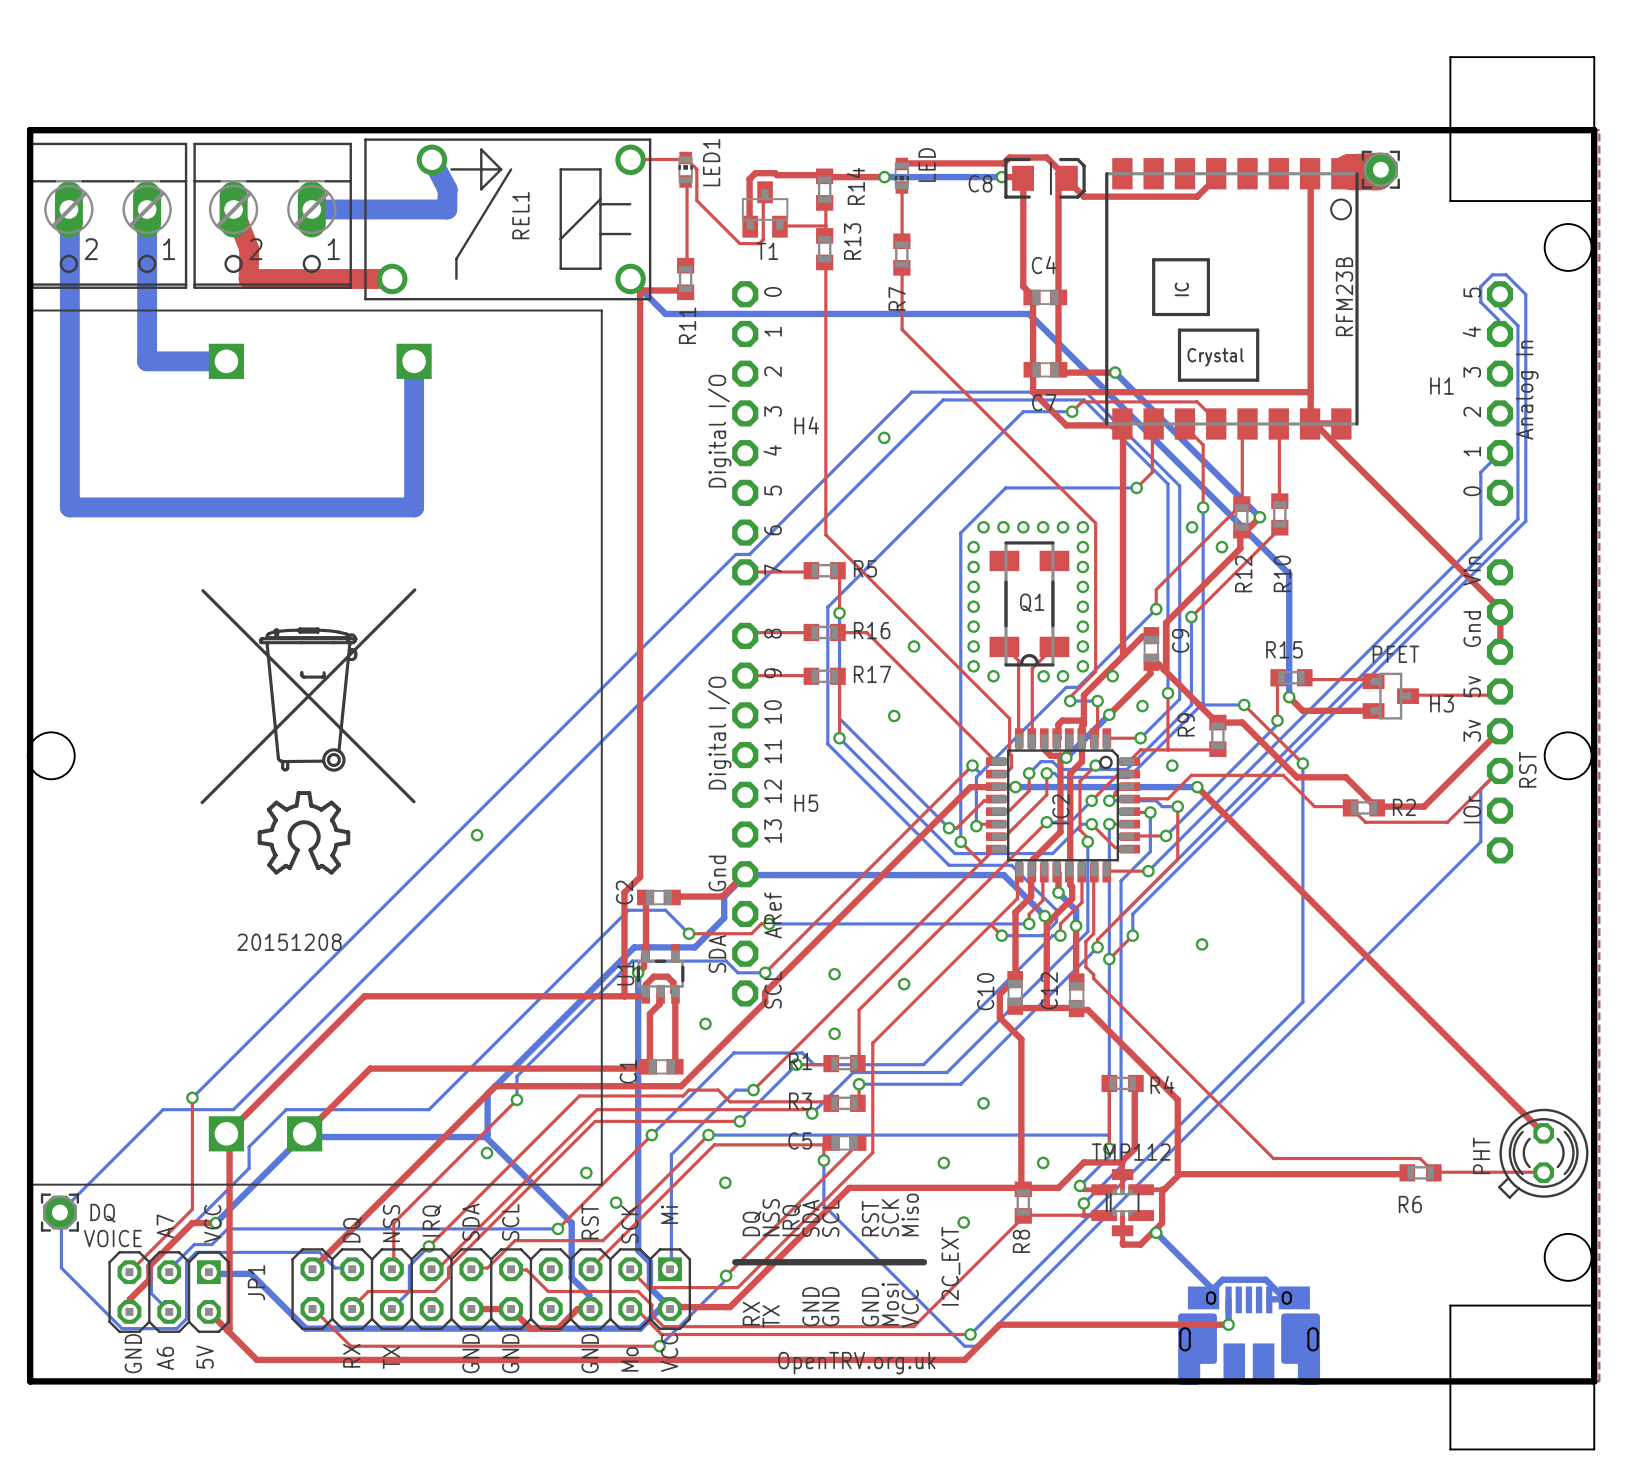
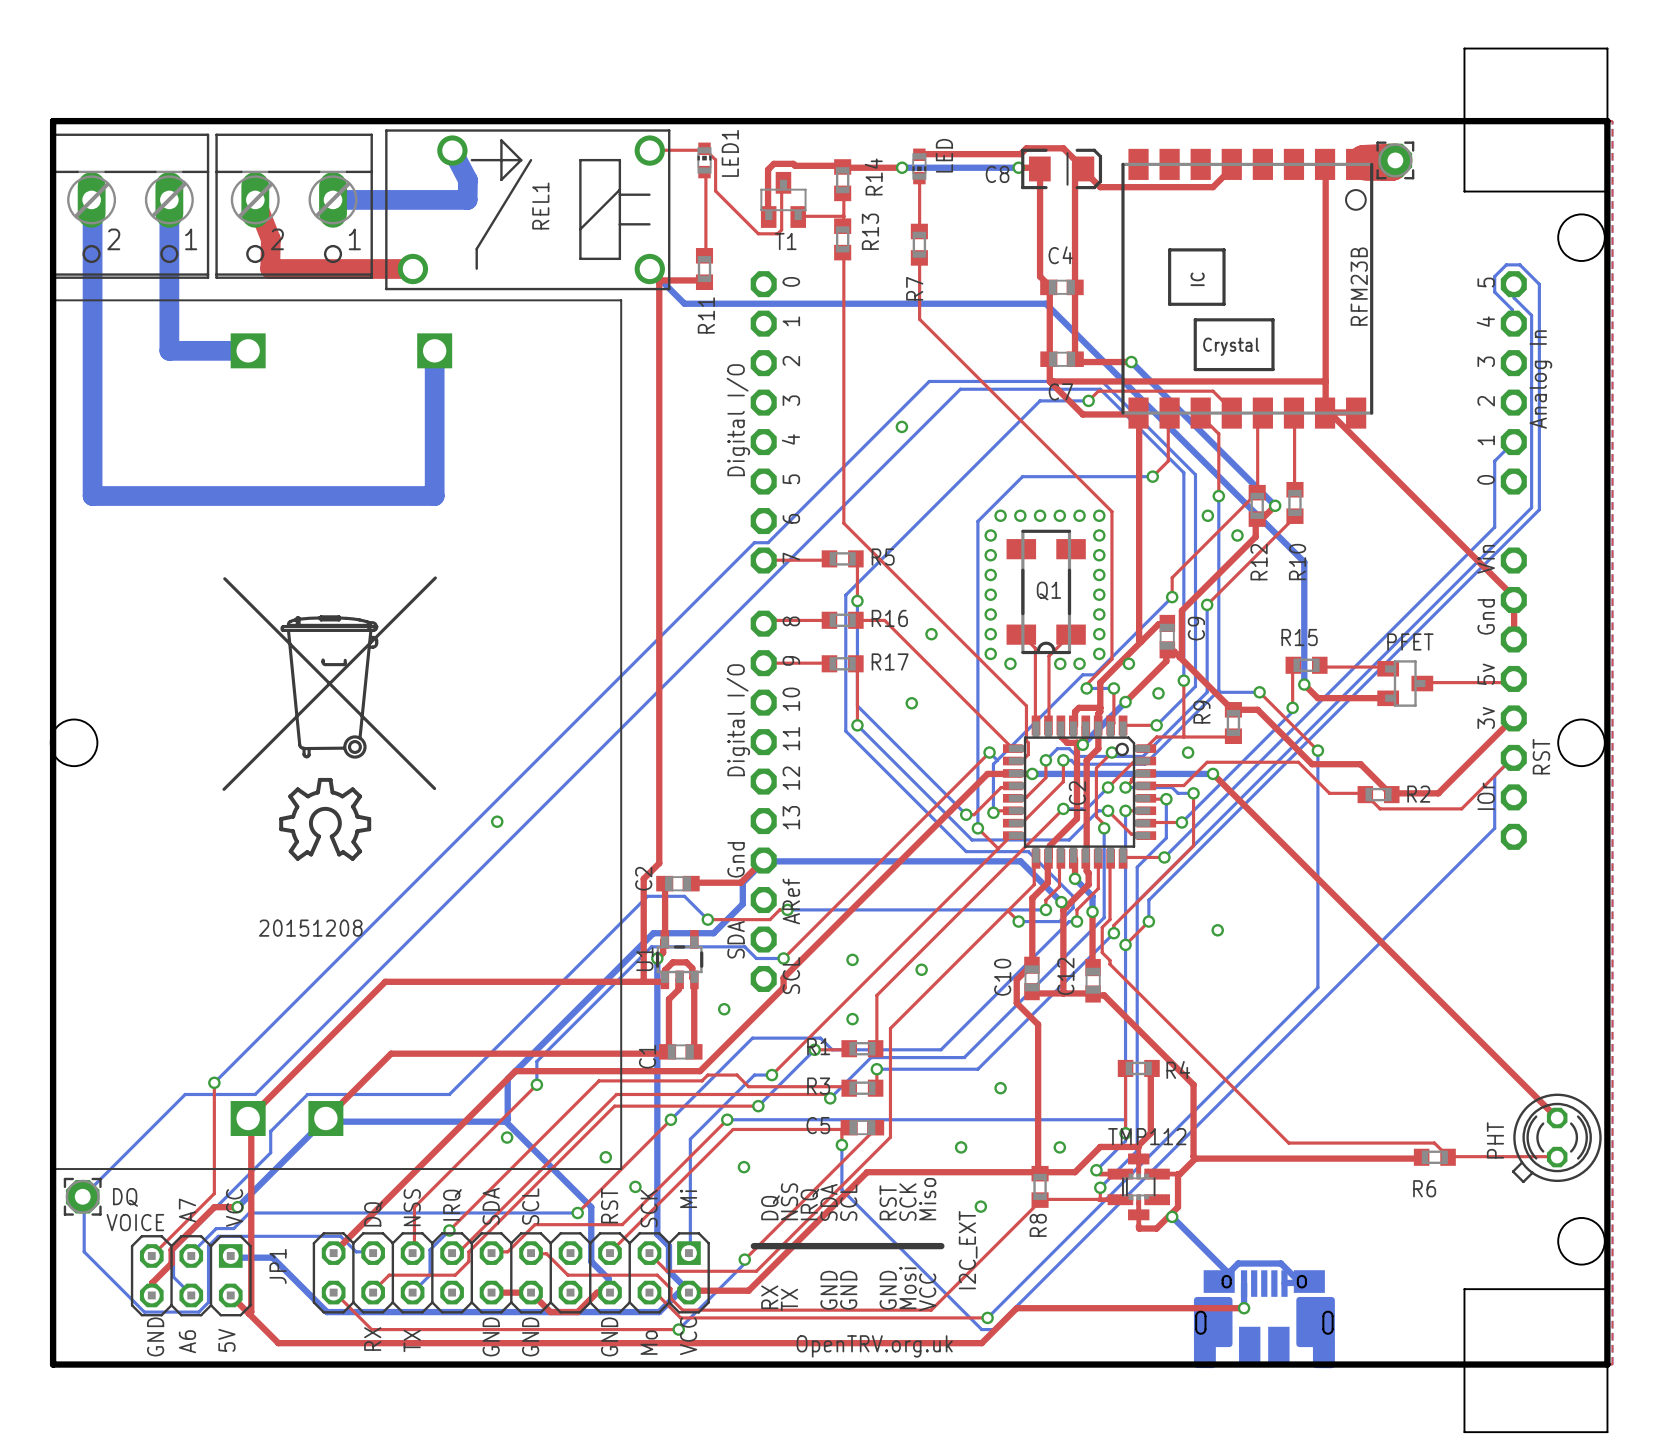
text: H1 (1442, 386) -> none
text: H4 (806, 425) -> none
text: H3 (1442, 703) -> none
text: H5 (806, 803) -> none

